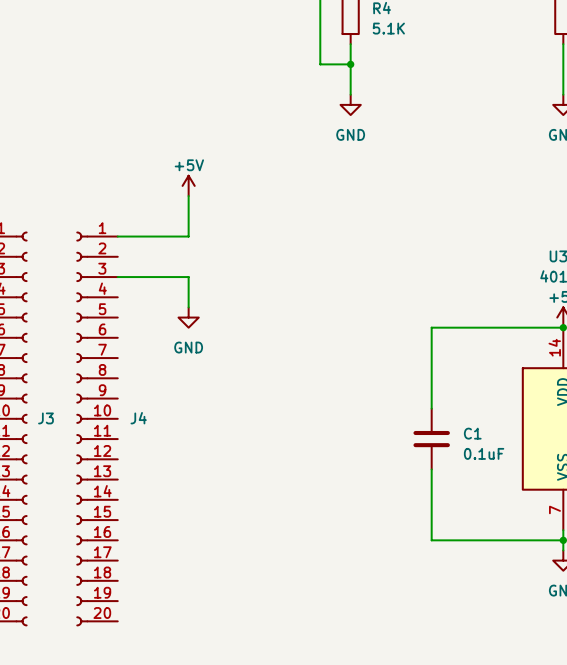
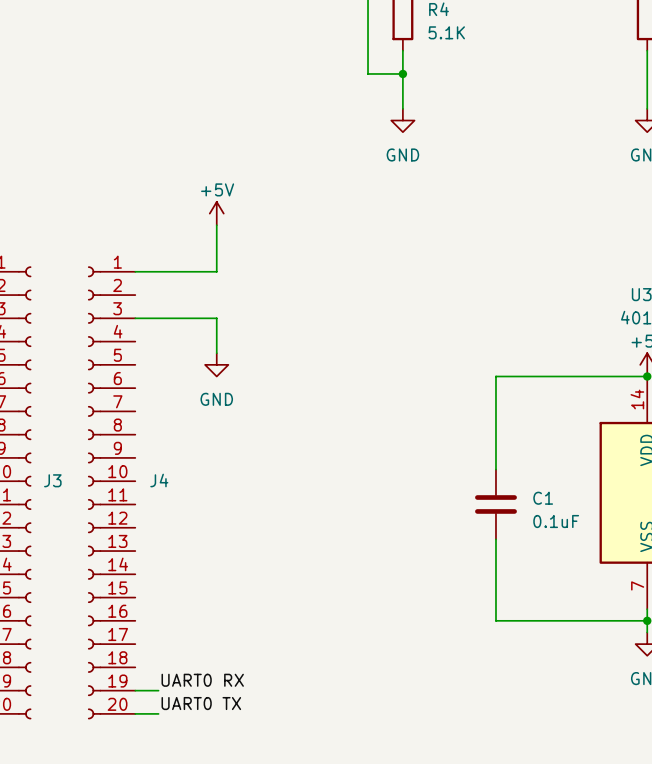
label: none -> UART0 RX (202, 680)
wire: none -> (135, 690) (158, 690)
label: none -> UART0 TX (201, 703)
wire: none -> (135, 713) (158, 713)

